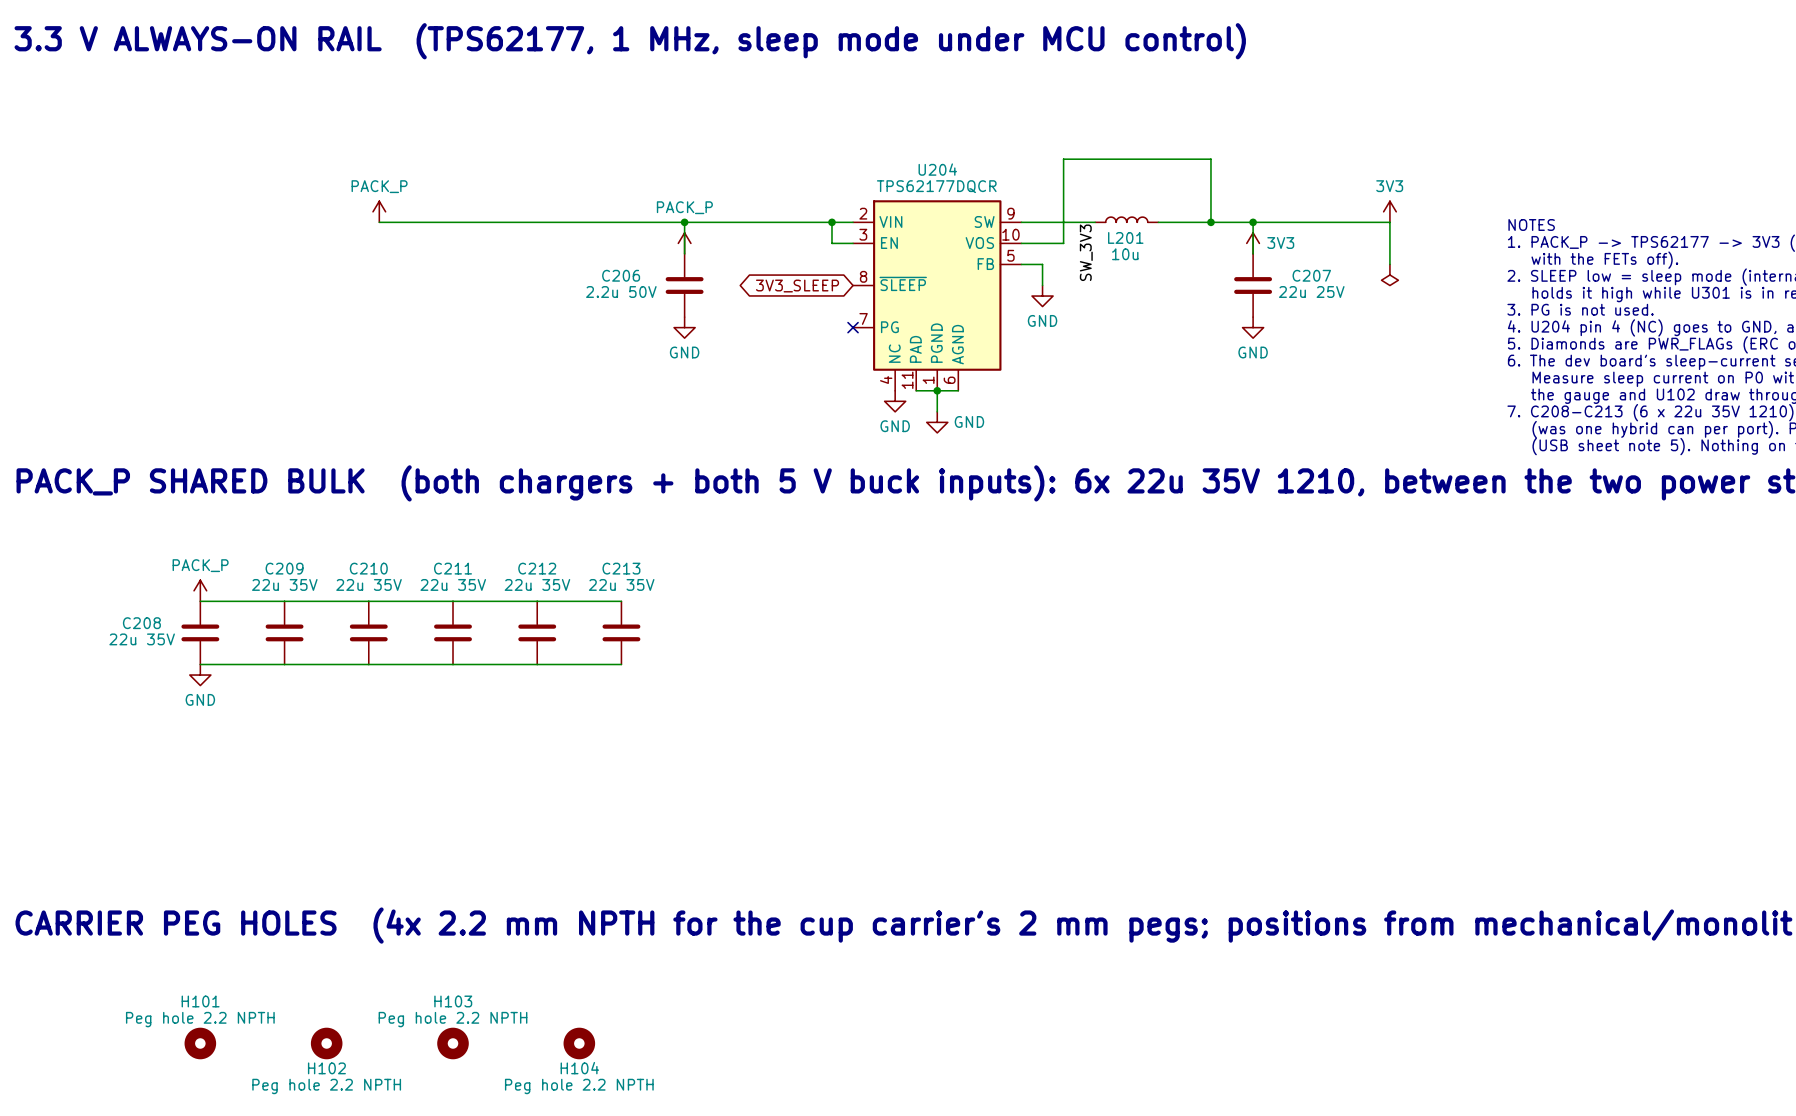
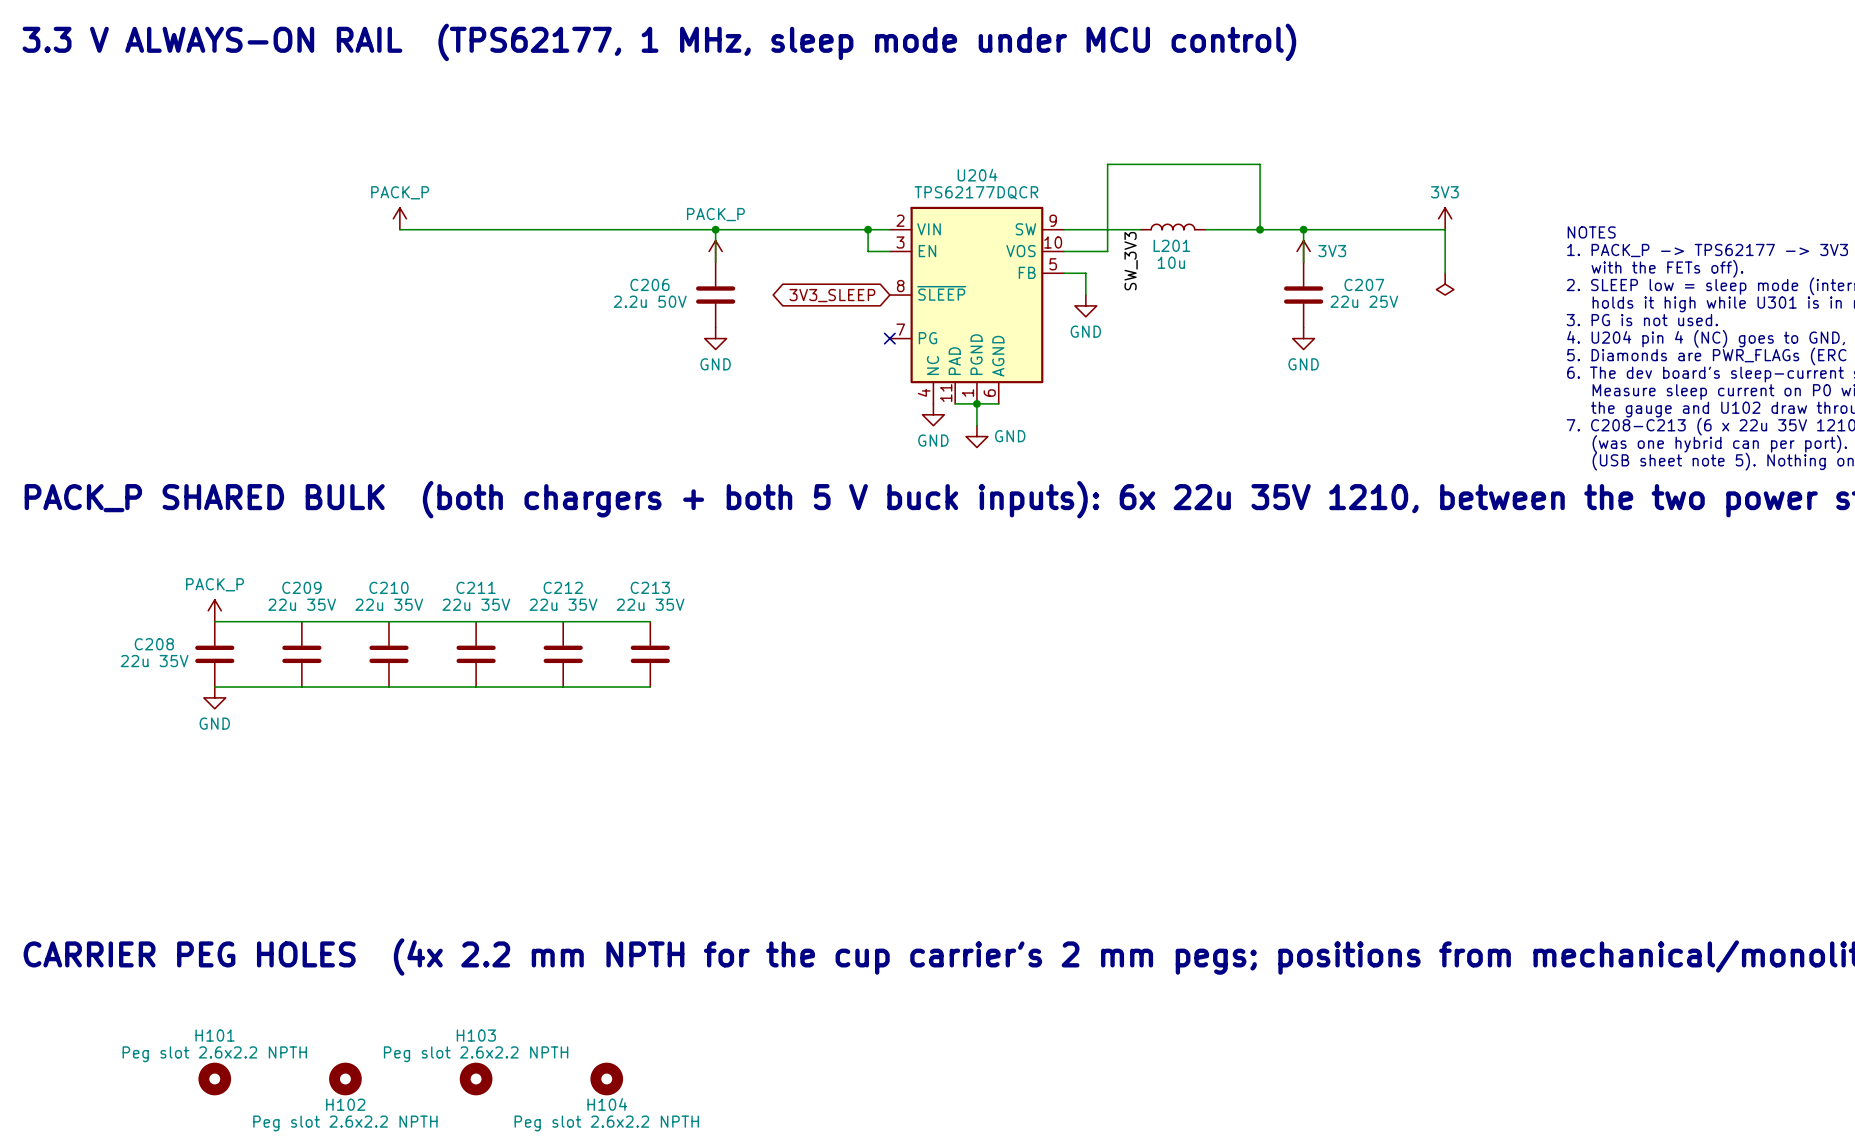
H101 value: Peg hole 2.2 NPTH (200, 1019) -> Peg slot 2.6x2.2 NPTH (214, 1054)
H103 value: Peg hole 2.2 NPTH (453, 1019) -> Peg slot 2.6x2.2 NPTH (476, 1054)
H102 value: Peg hole 2.2 NPTH (326, 1086) -> Peg slot 2.6x2.2 NPTH (345, 1123)
H104 value: Peg hole 2.2 NPTH (579, 1086) -> Peg slot 2.6x2.2 NPTH (606, 1123)

